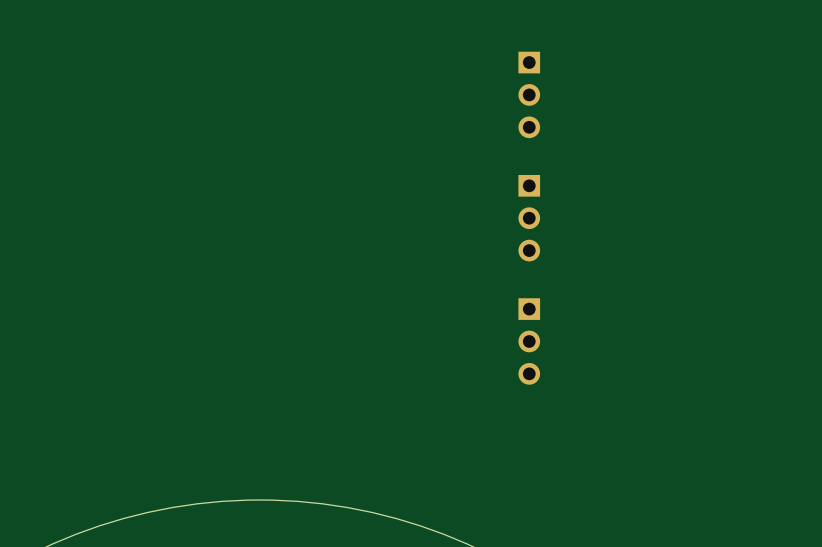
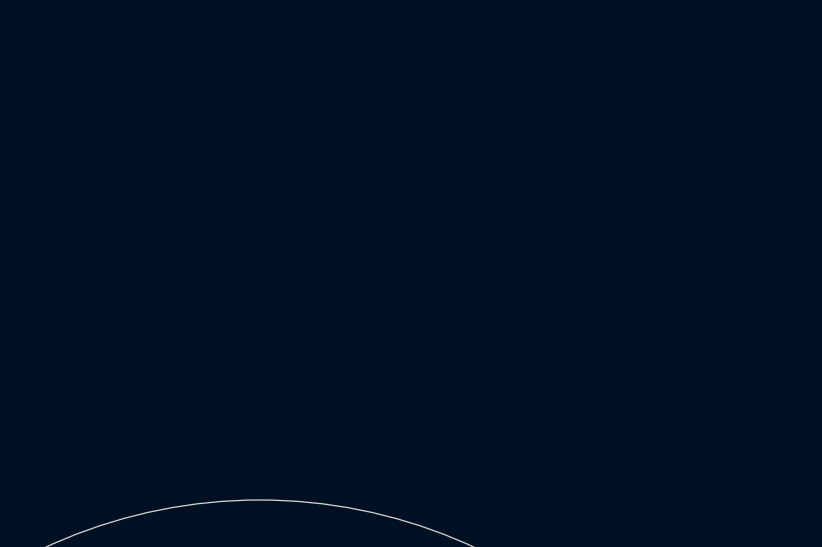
part: (529, 94) -> none
part: (529, 218) -> none
part: (529, 341) -> none

